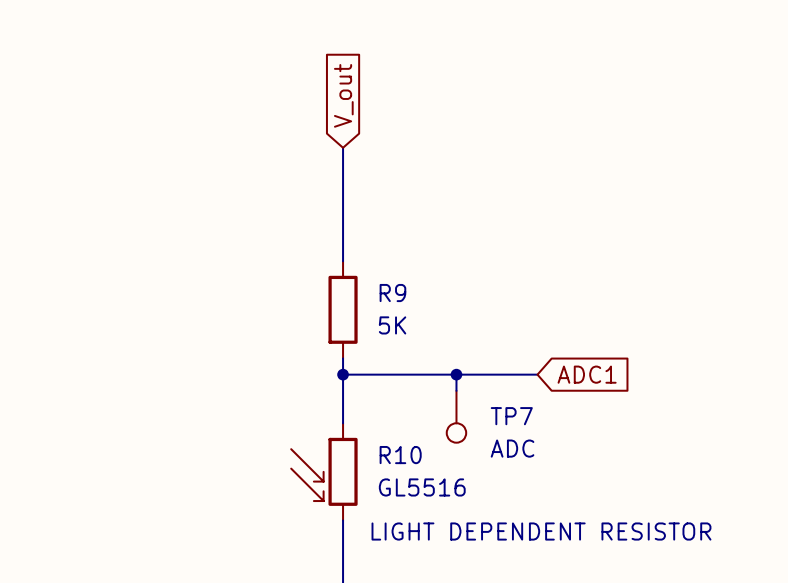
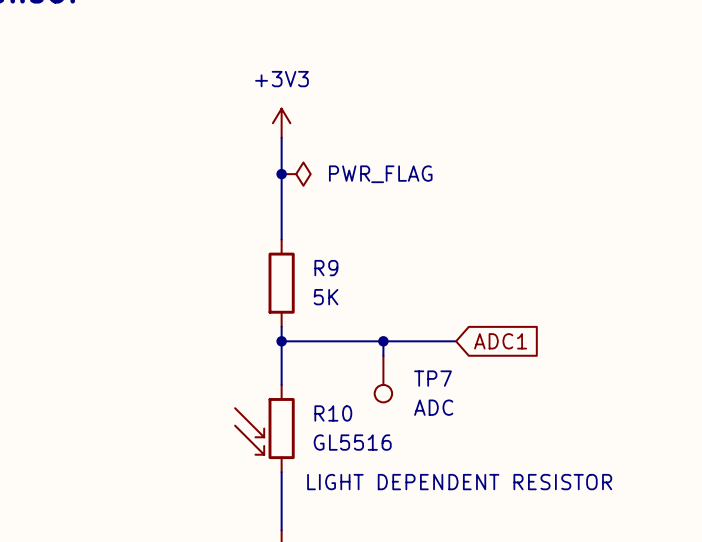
global label: V_out (343, 95) -> none
power symbol: none -> +3V3 (281, 123)
junction: none -> (281, 174)
power symbol: none -> PWR_FLAG (296, 174)

